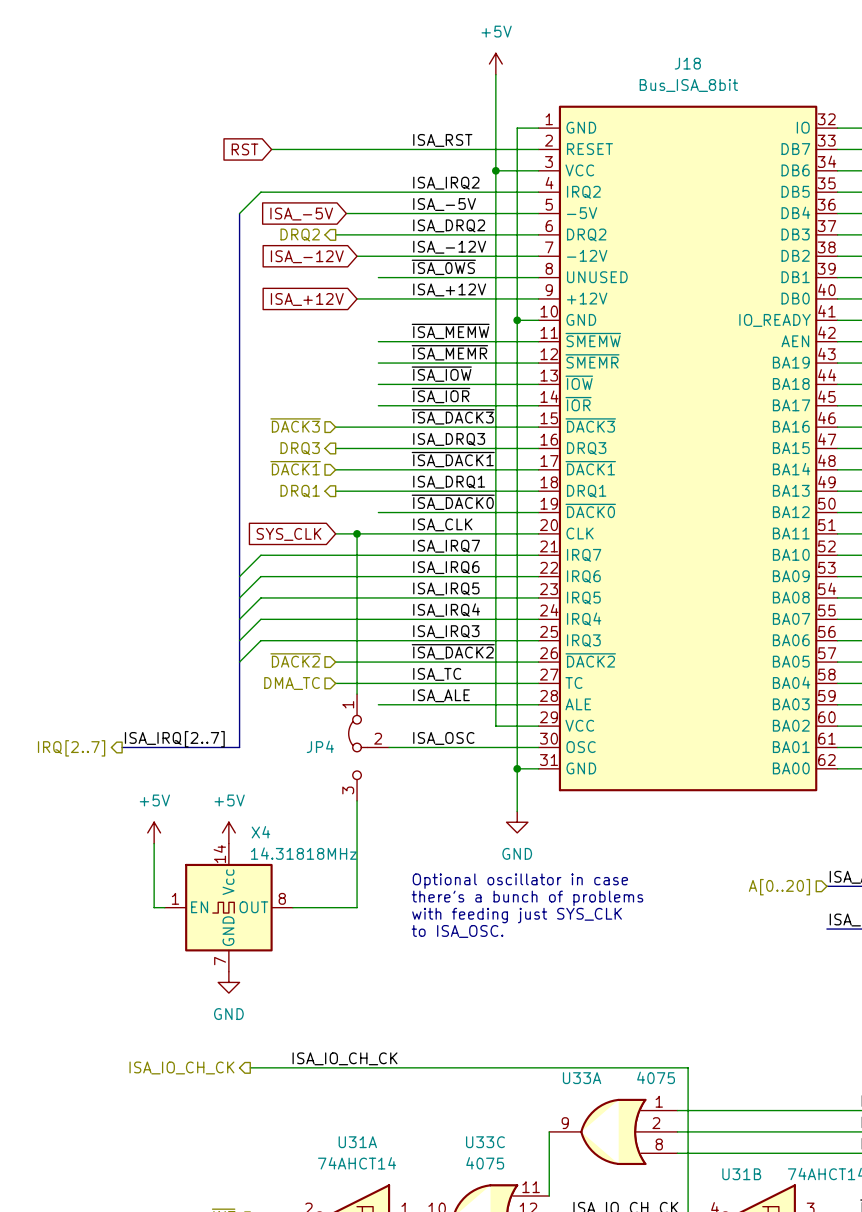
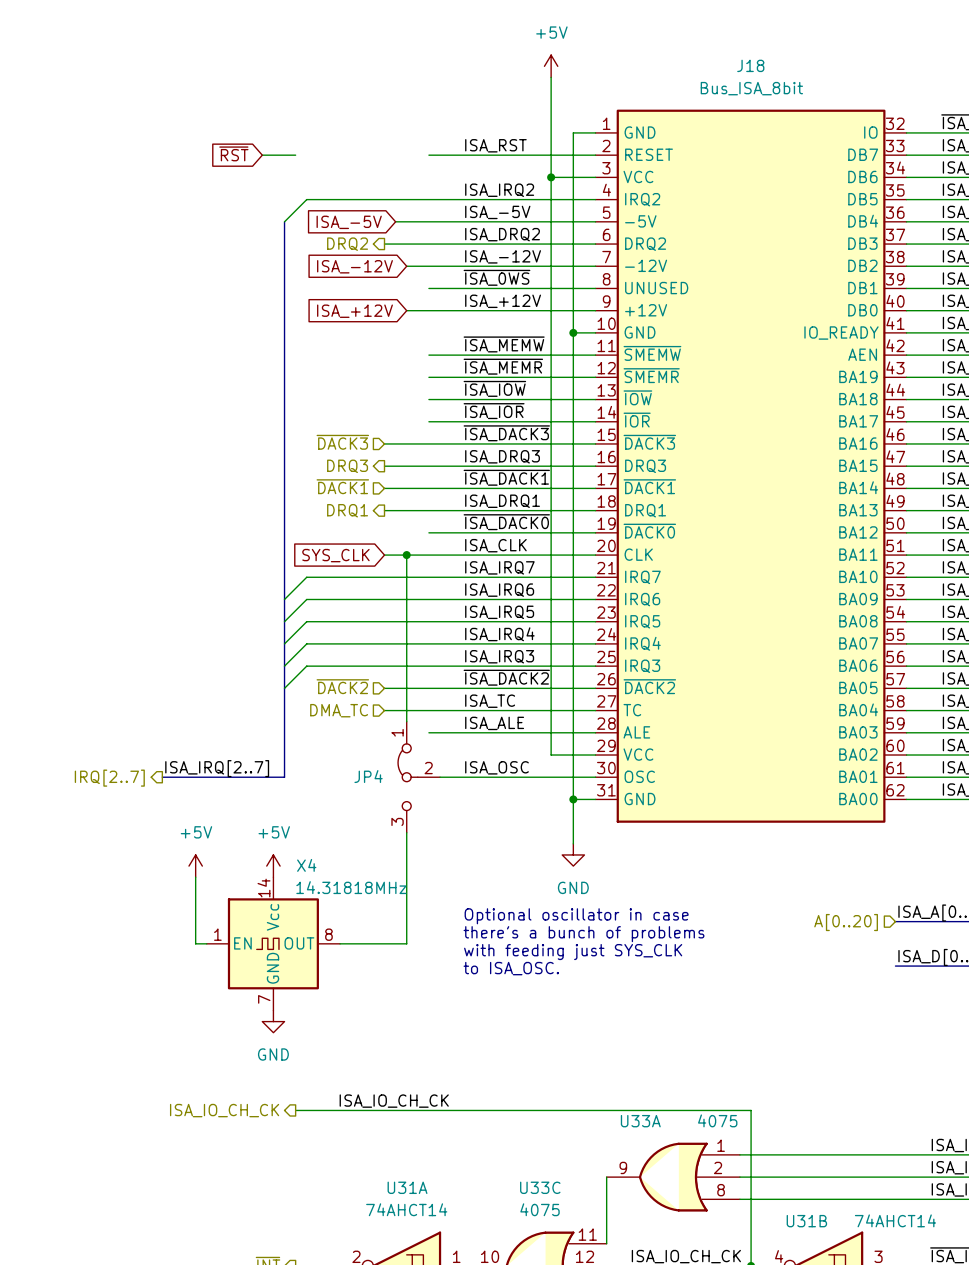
wire: none -> (262, 155) (295, 155)
global label: RST (245, 149) -> ~{RST} (233, 153)
wire: (271, 149) (378, 149) -> none

